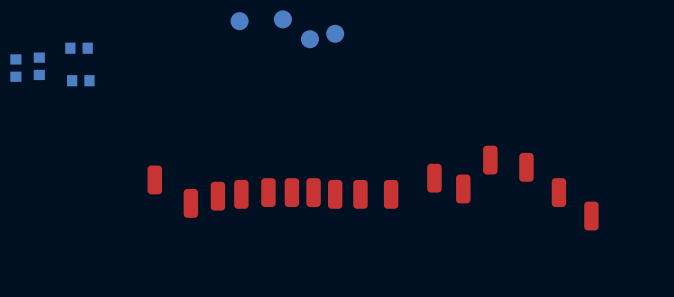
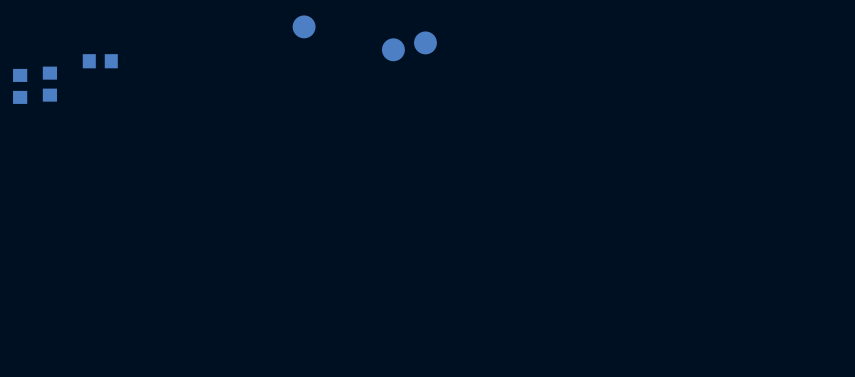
part: (282, 19) -> none
part: (80, 80) -> none
part: (490, 160) -> none
part: (526, 167) -> none
part: (434, 178) -> none
part: (154, 179) -> none
part: (463, 188) -> none
part: (268, 192) -> none
part: (291, 192) -> none
part: (313, 192) -> none
part: (558, 192) -> none
part: (241, 194) -> none
part: (335, 194) -> none
part: (360, 194) -> none
part: (391, 194) -> none
part: (217, 196) -> none
part: (190, 203) -> none
part: (591, 216) -> none

